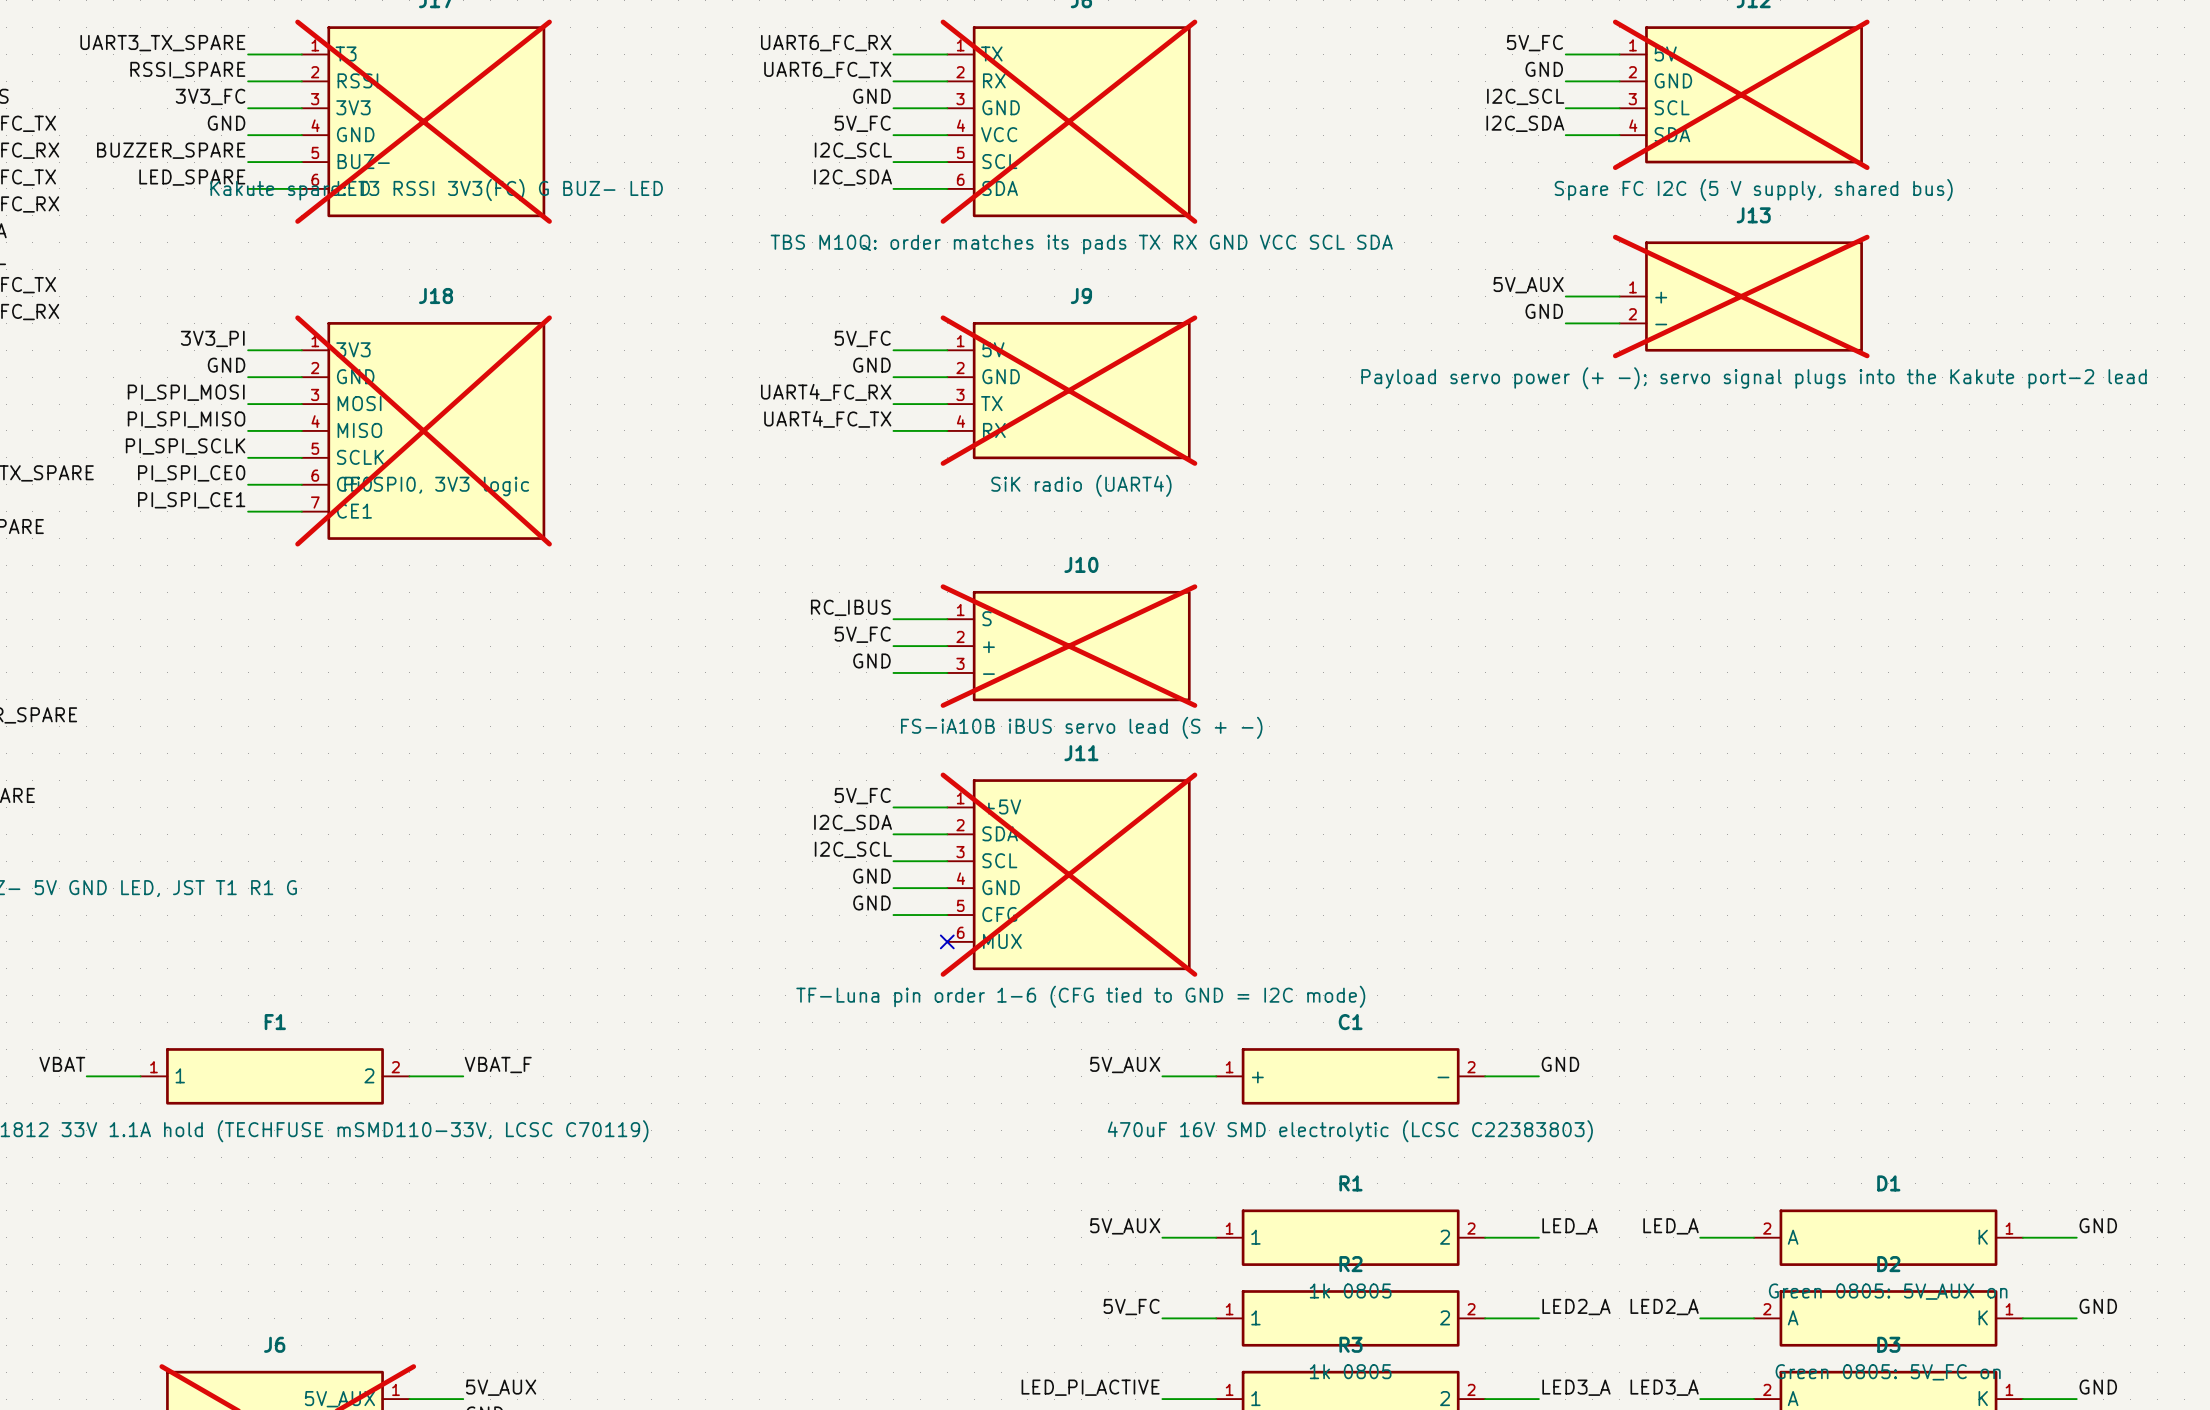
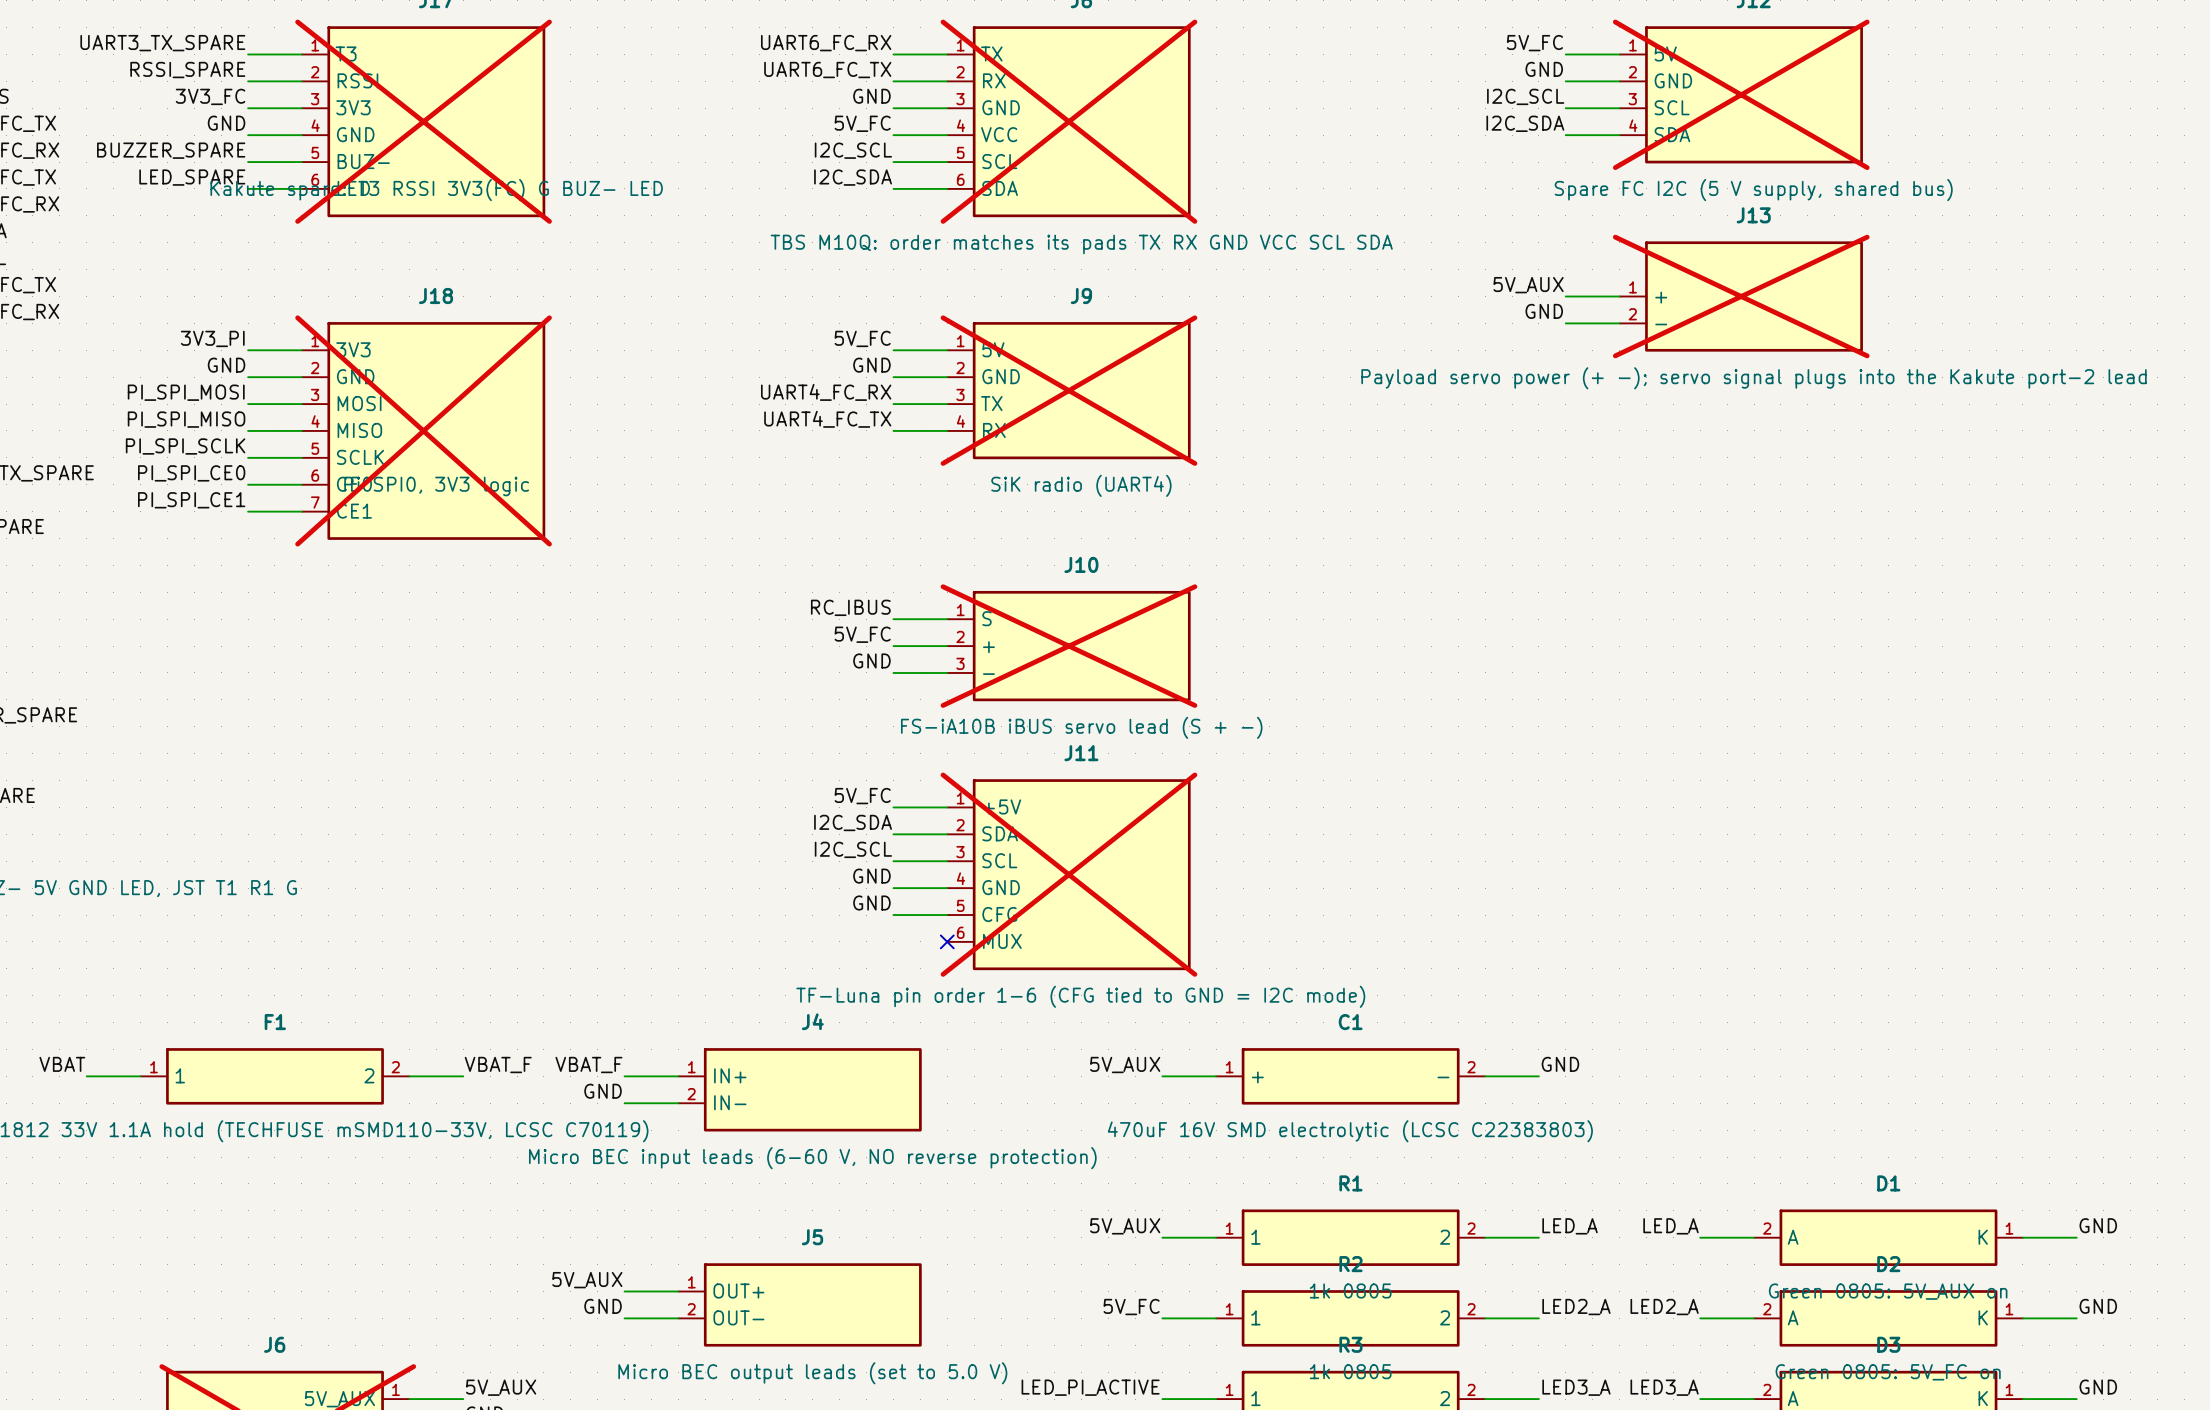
label: none -> VBAT_F (588, 1065)
wire: none -> (624, 1076) (678, 1076)
J4: none -> Micro BEC input leads (6-60 V, NO reverse protection) (800, 1089)
label: none -> GND (603, 1091)
wire: none -> (624, 1103) (678, 1103)
label: none -> 5V_AUX (587, 1280)
wire: none -> (624, 1291) (678, 1291)
J5: none -> Micro BEC output leads (set to 5.0 V) (800, 1304)
label: none -> GND (603, 1306)
wire: none -> (624, 1318) (678, 1318)

